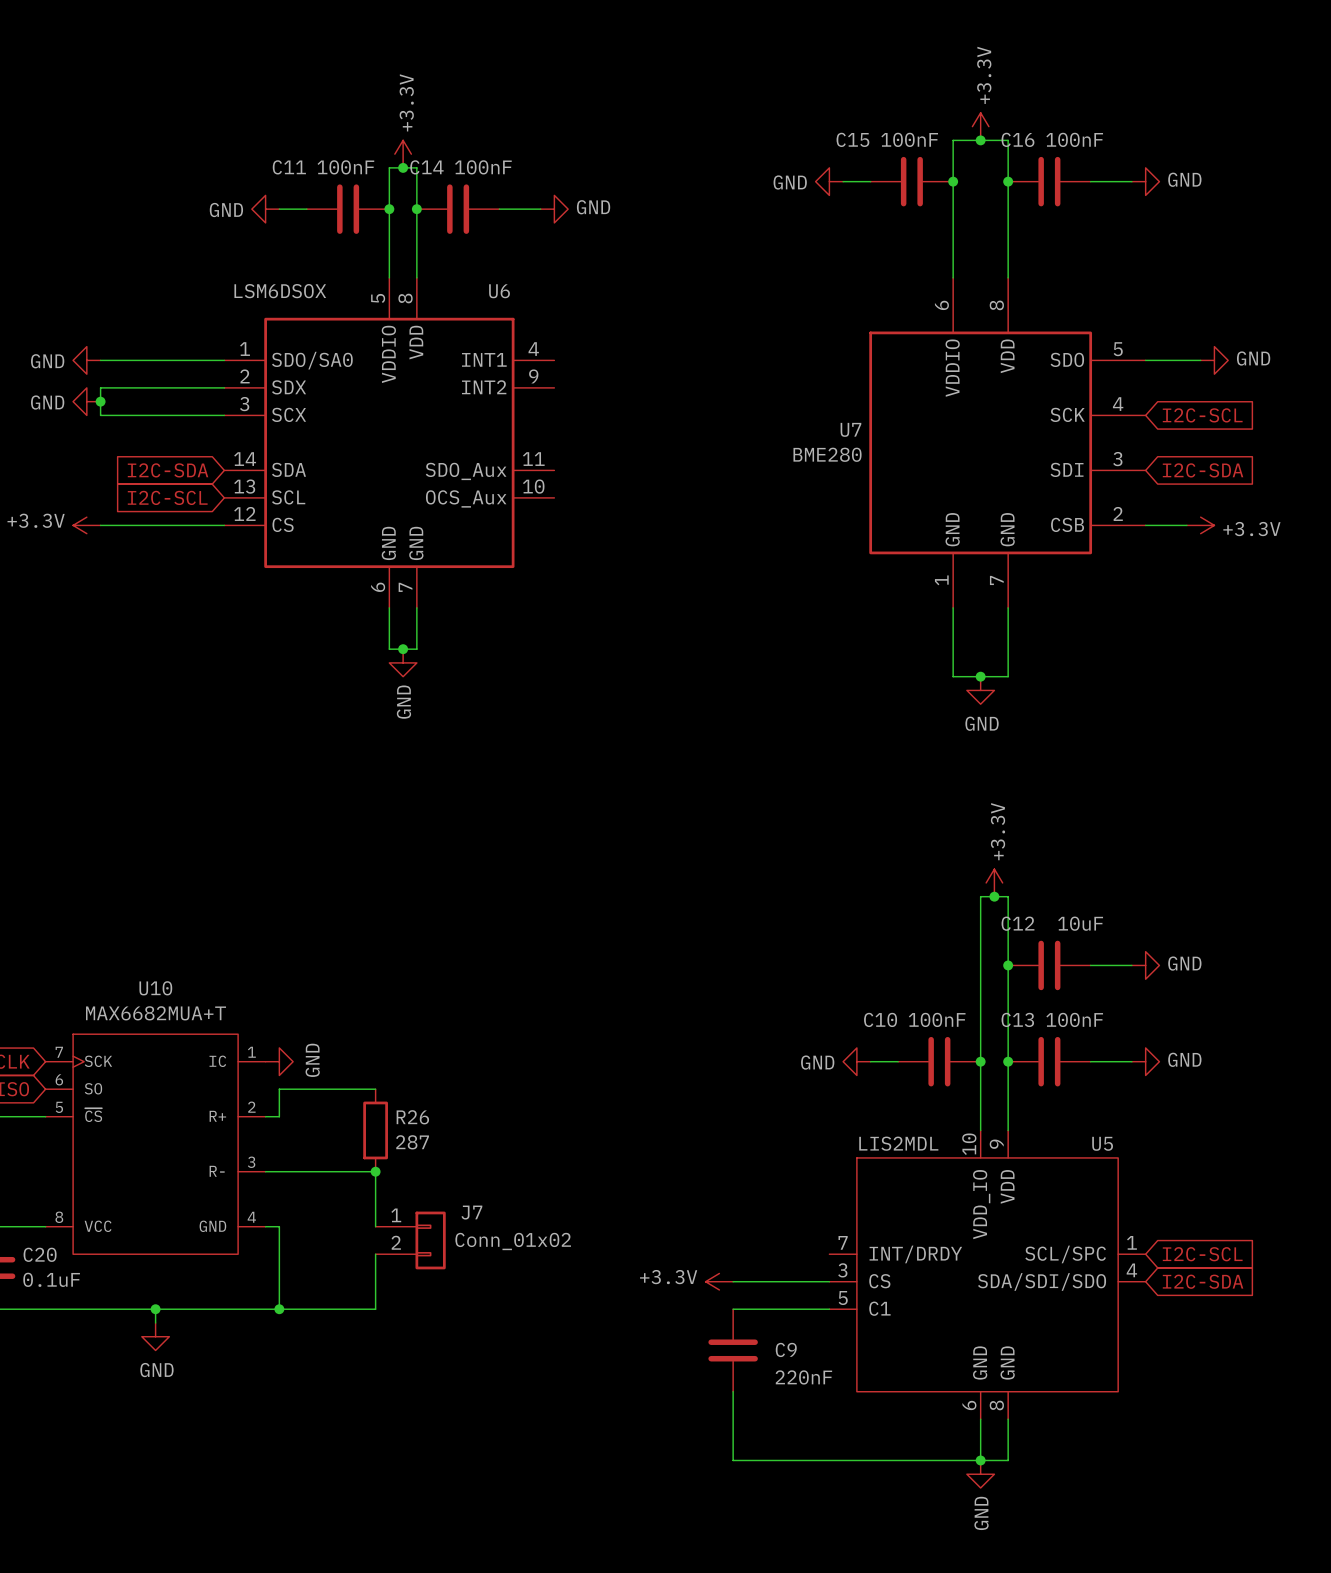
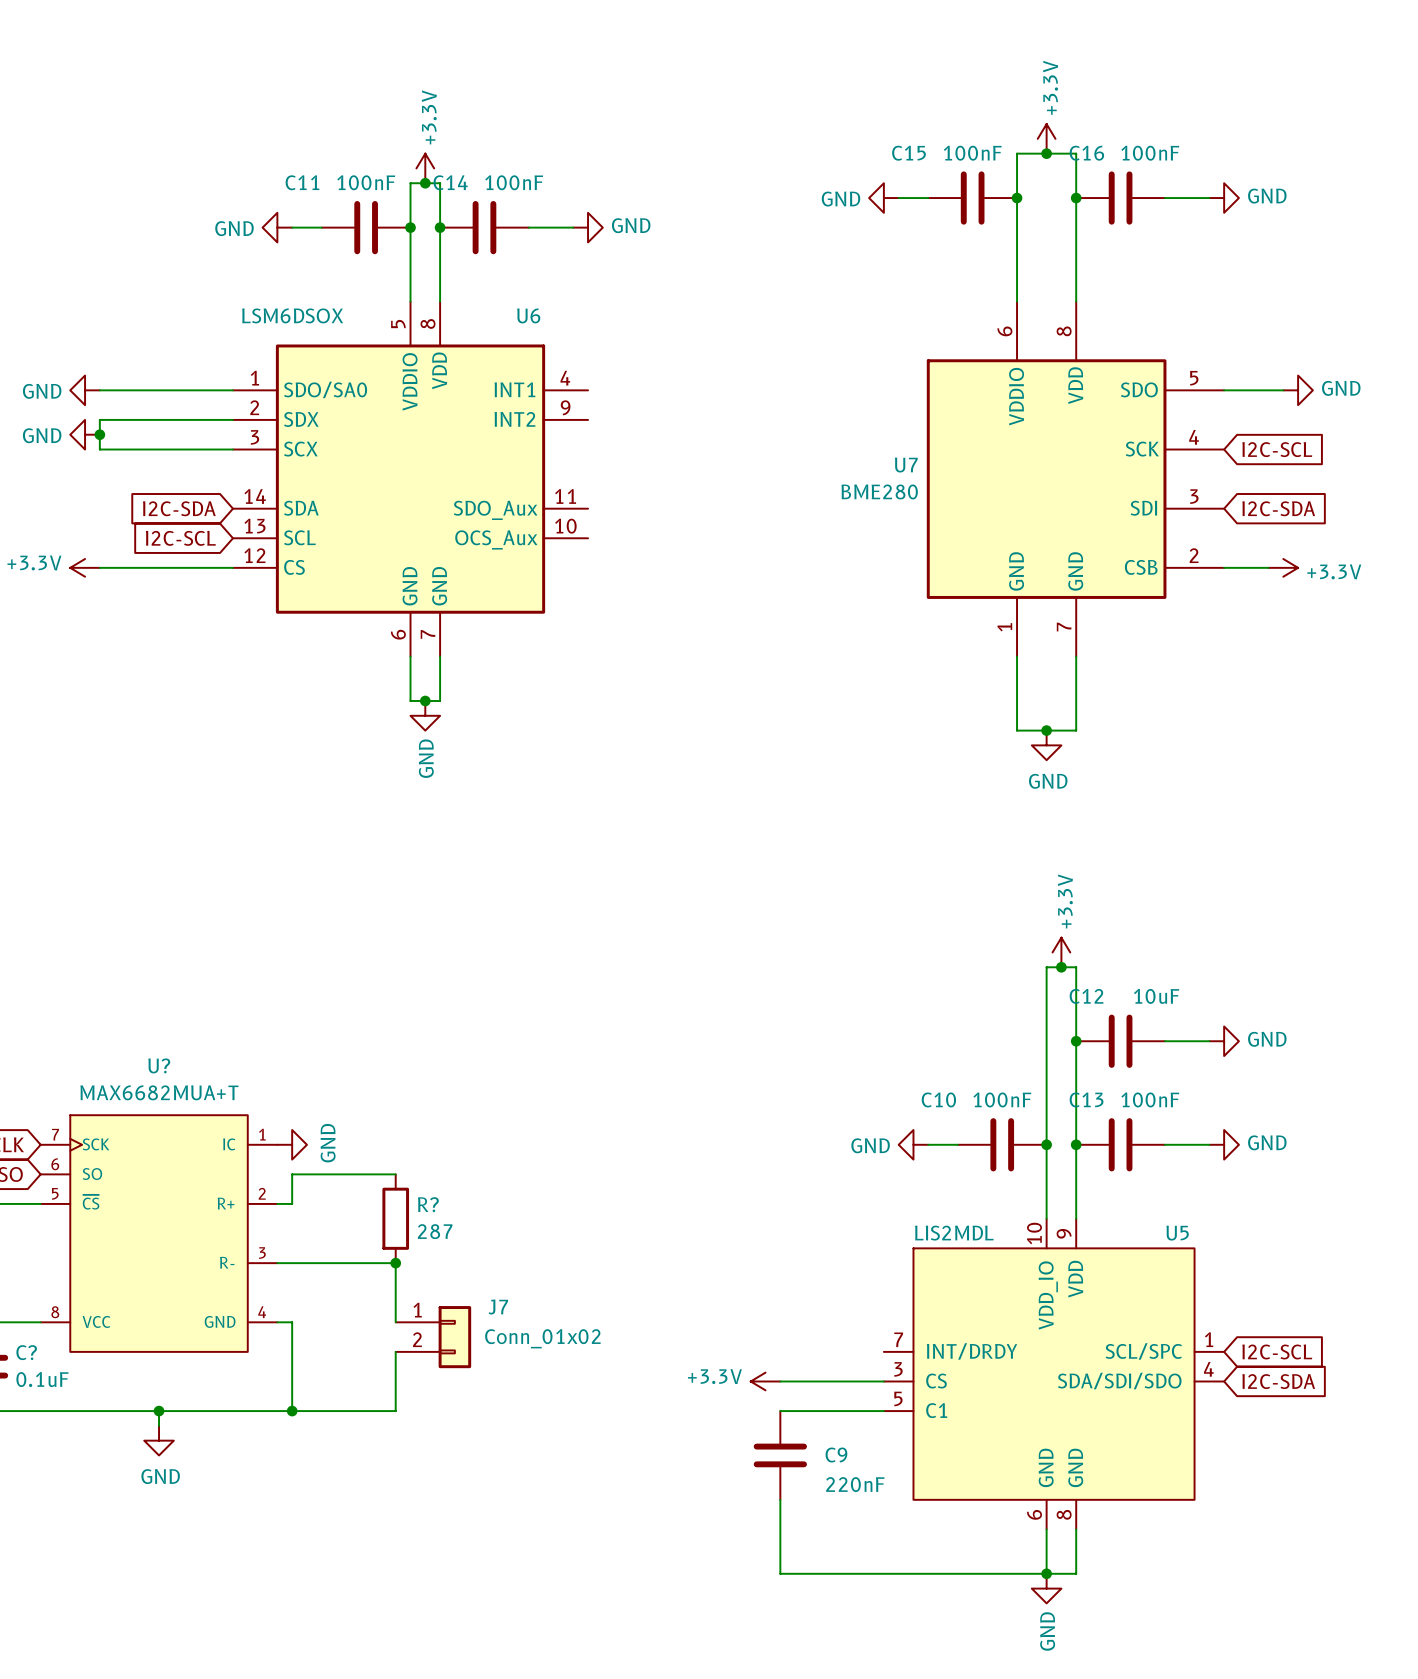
U10 name: U10 (155, 988) -> U? (159, 1065)
R26 name: R26 (412, 1117) -> R? (428, 1204)
C20 name: C20 (40, 1254) -> C? (26, 1352)

